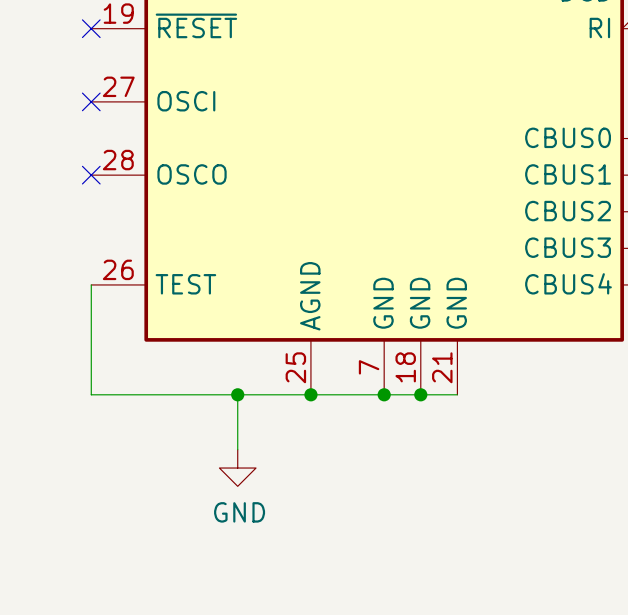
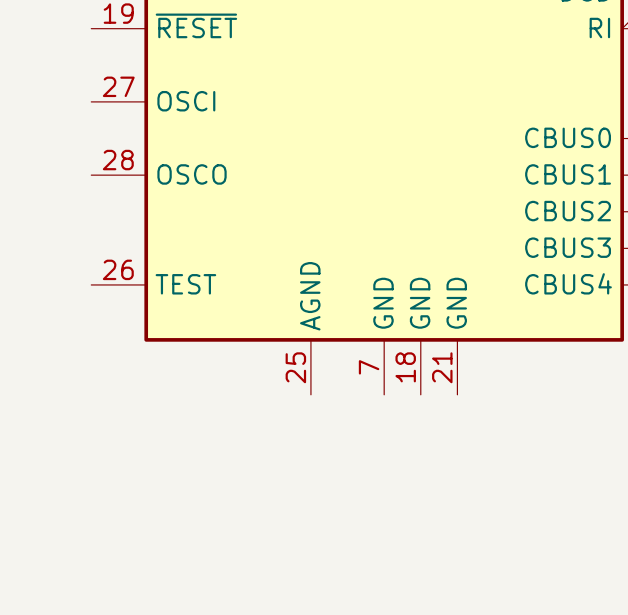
no-connect mark: (91, 28) -> none
no-connect mark: (91, 101) -> none
no-connect mark: (91, 175) -> none
wire: (91, 284) (91, 394) (457, 394) -> none
wire: (237, 394) (237, 449) -> none
junction: (237, 394) -> none
junction: (310, 394) -> none
junction: (384, 394) -> none
junction: (420, 394) -> none
power symbol: GND (237, 468) -> none

